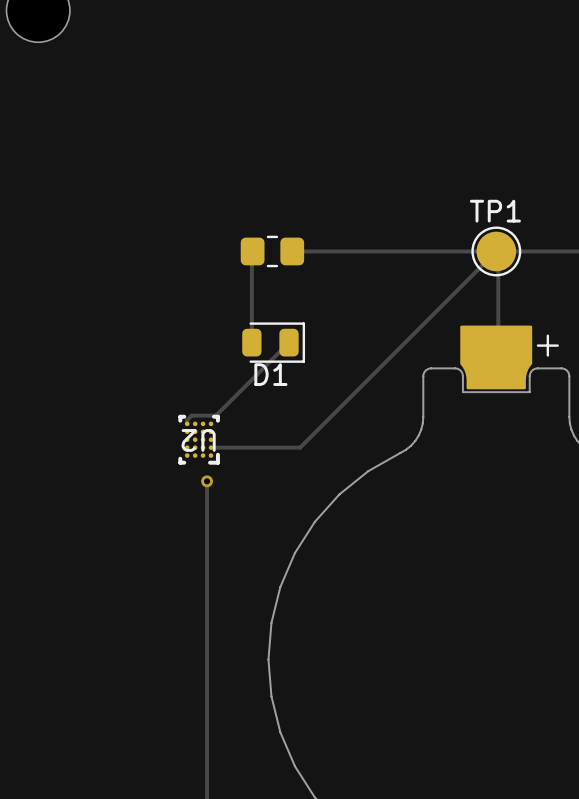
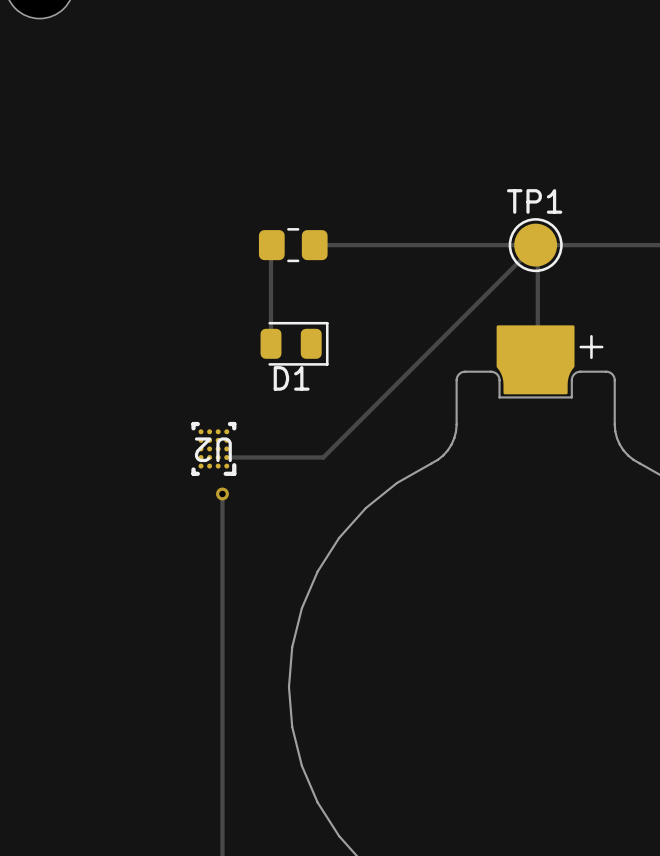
track: (289, 337) (289, 342) (216, 415) (191, 415) (186, 420) (186, 423) -> none

